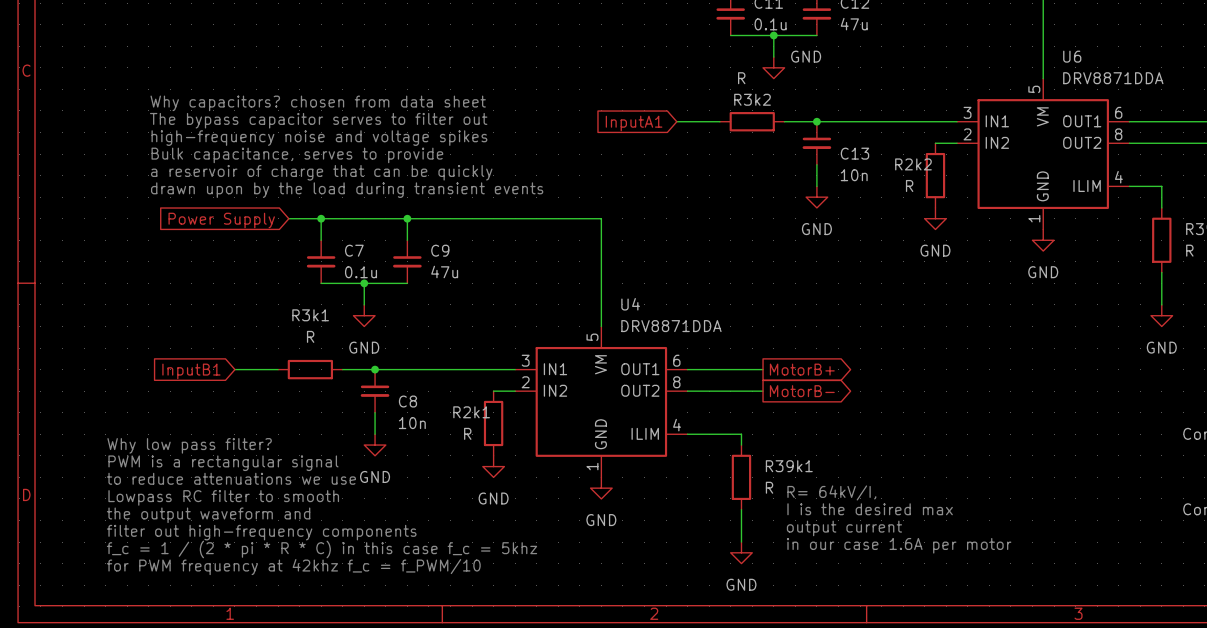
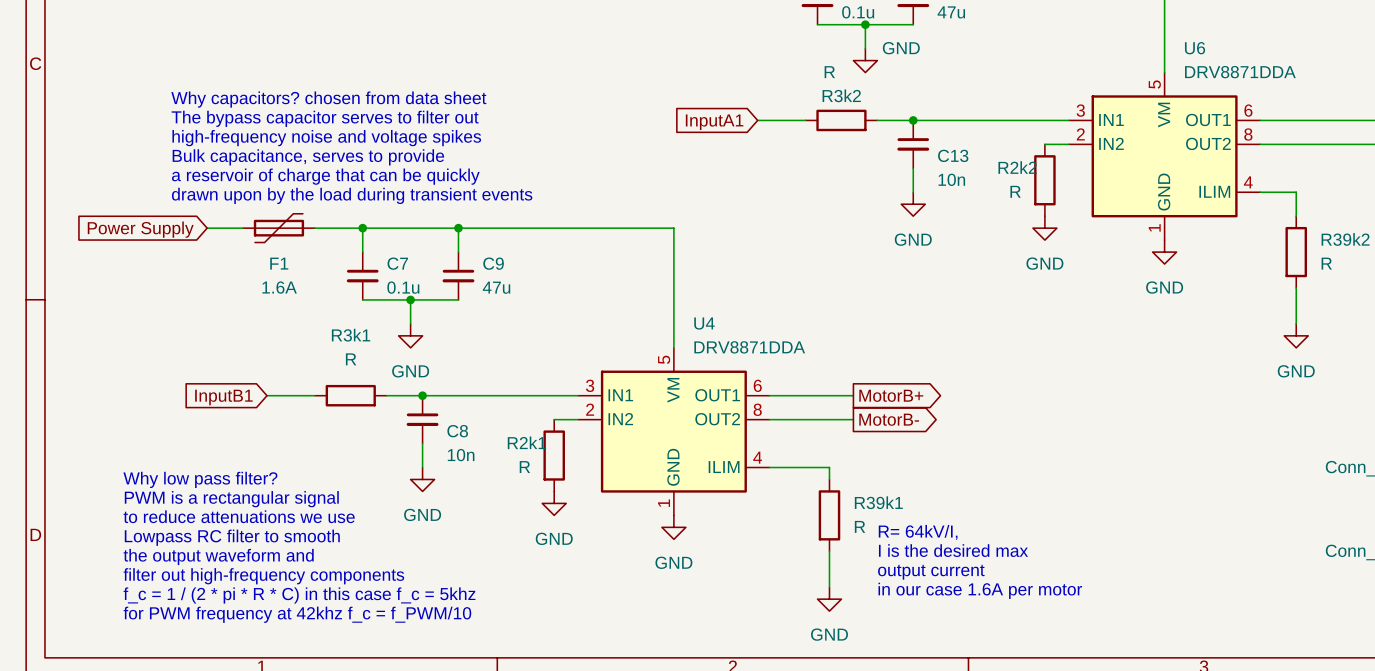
F1: none -> 1.6A (278, 228)
wire: none -> (314, 228) (326, 228)
global label position: Power Supply (221, 220) -> Power Supply (140, 229)

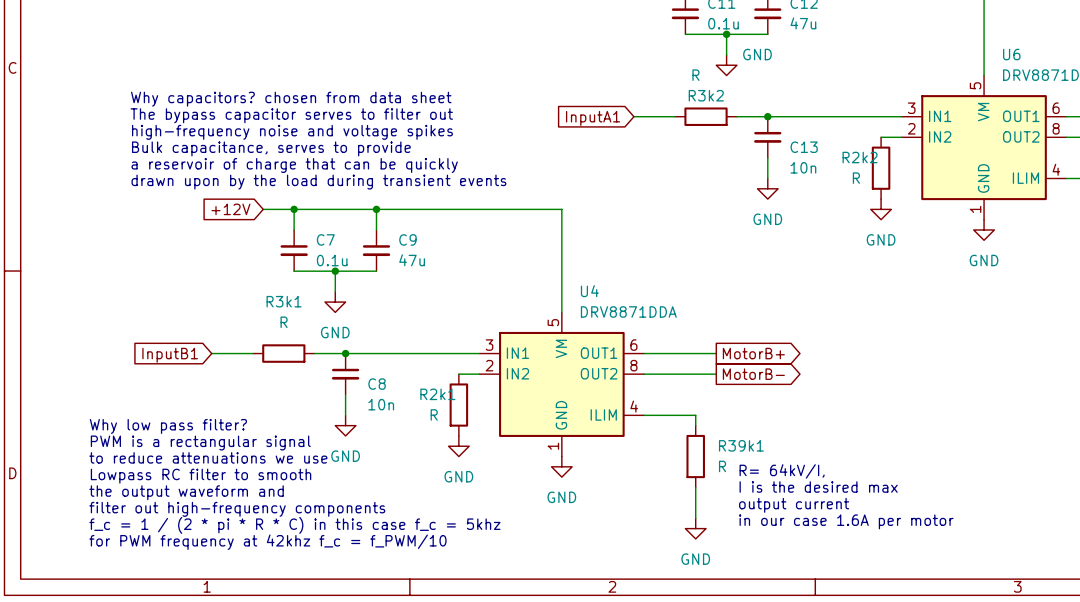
wire: (207, 228) (243, 228) -> none
F1: 1.6A (278, 228) -> none
global label: none -> +12V (230, 209)
wire: (314, 228) (326, 228) -> none
global label: Power Supply (140, 229) -> none

